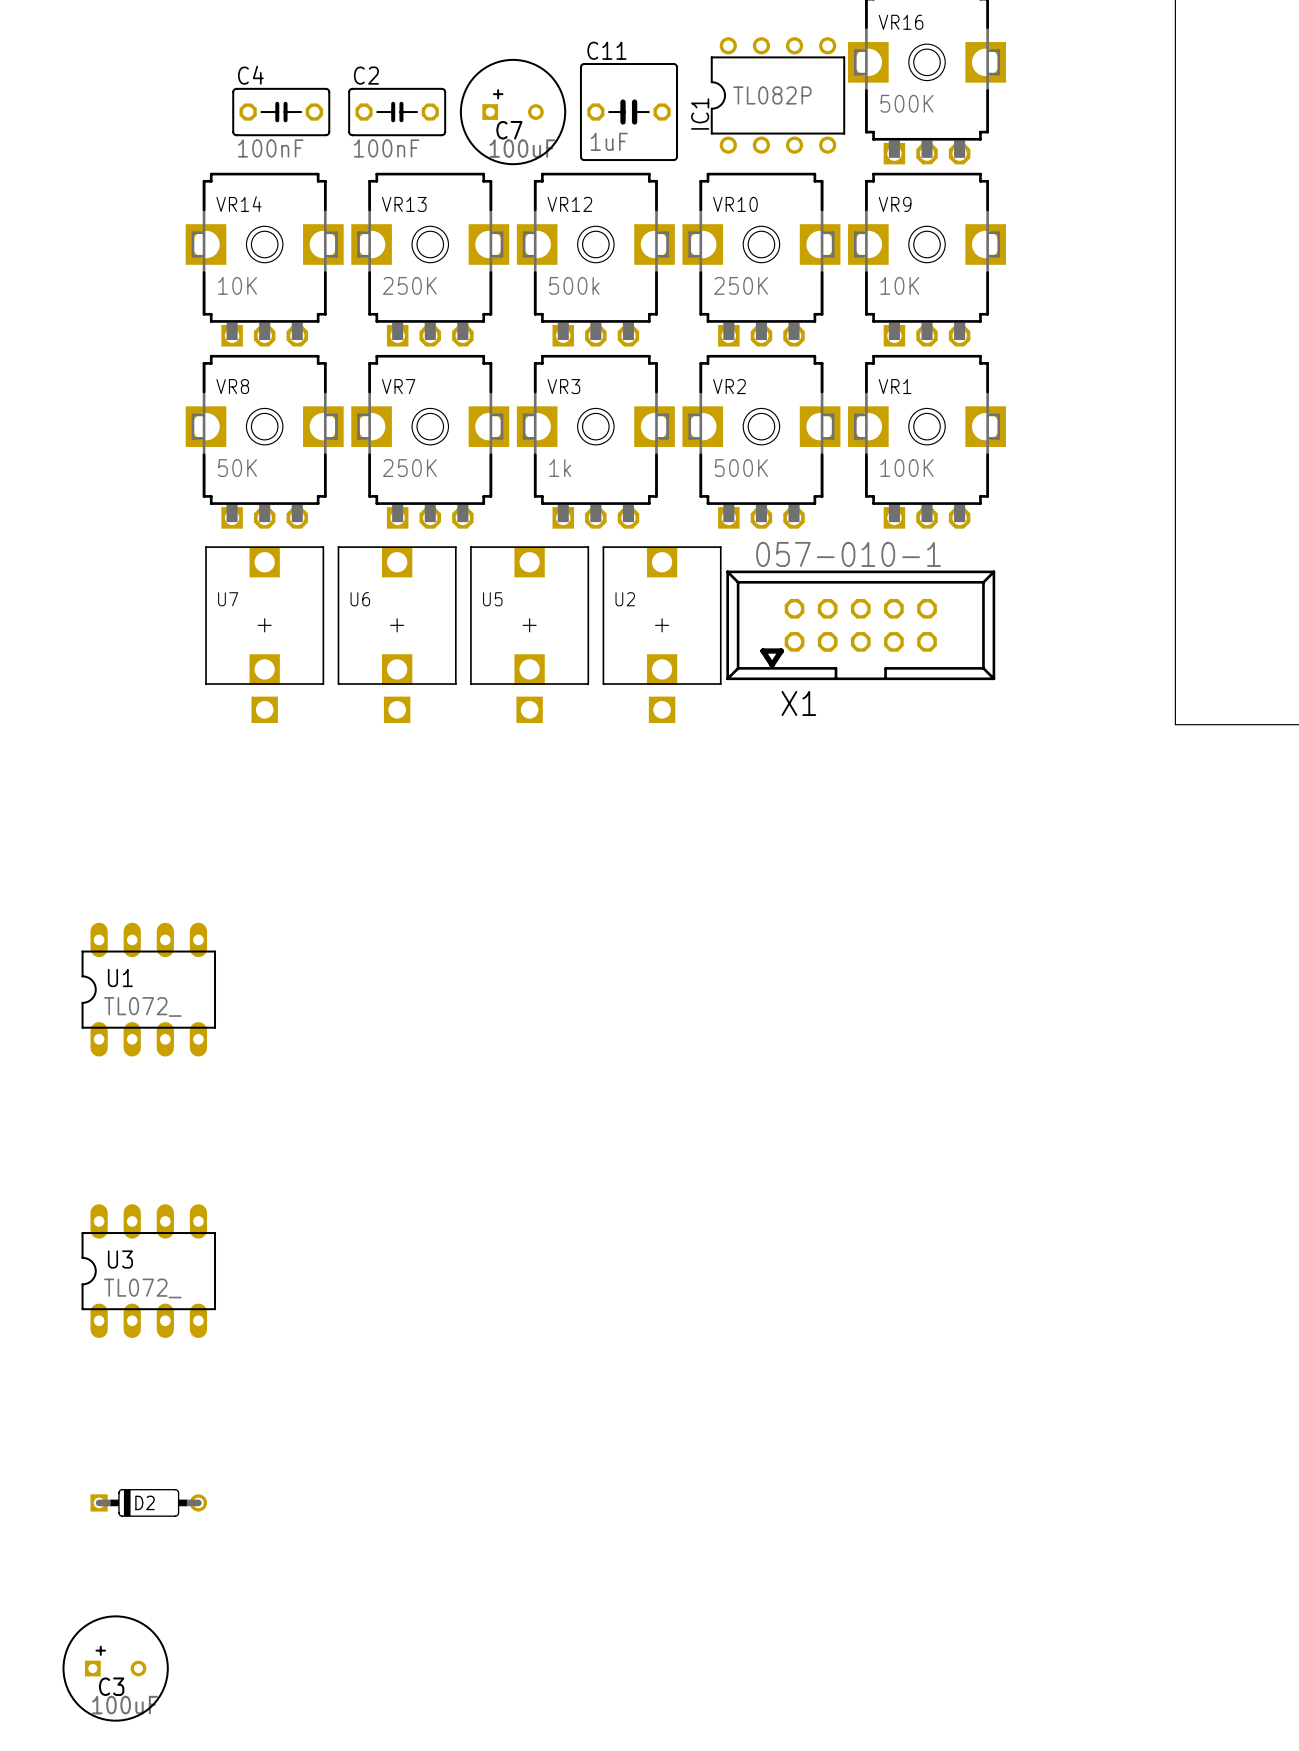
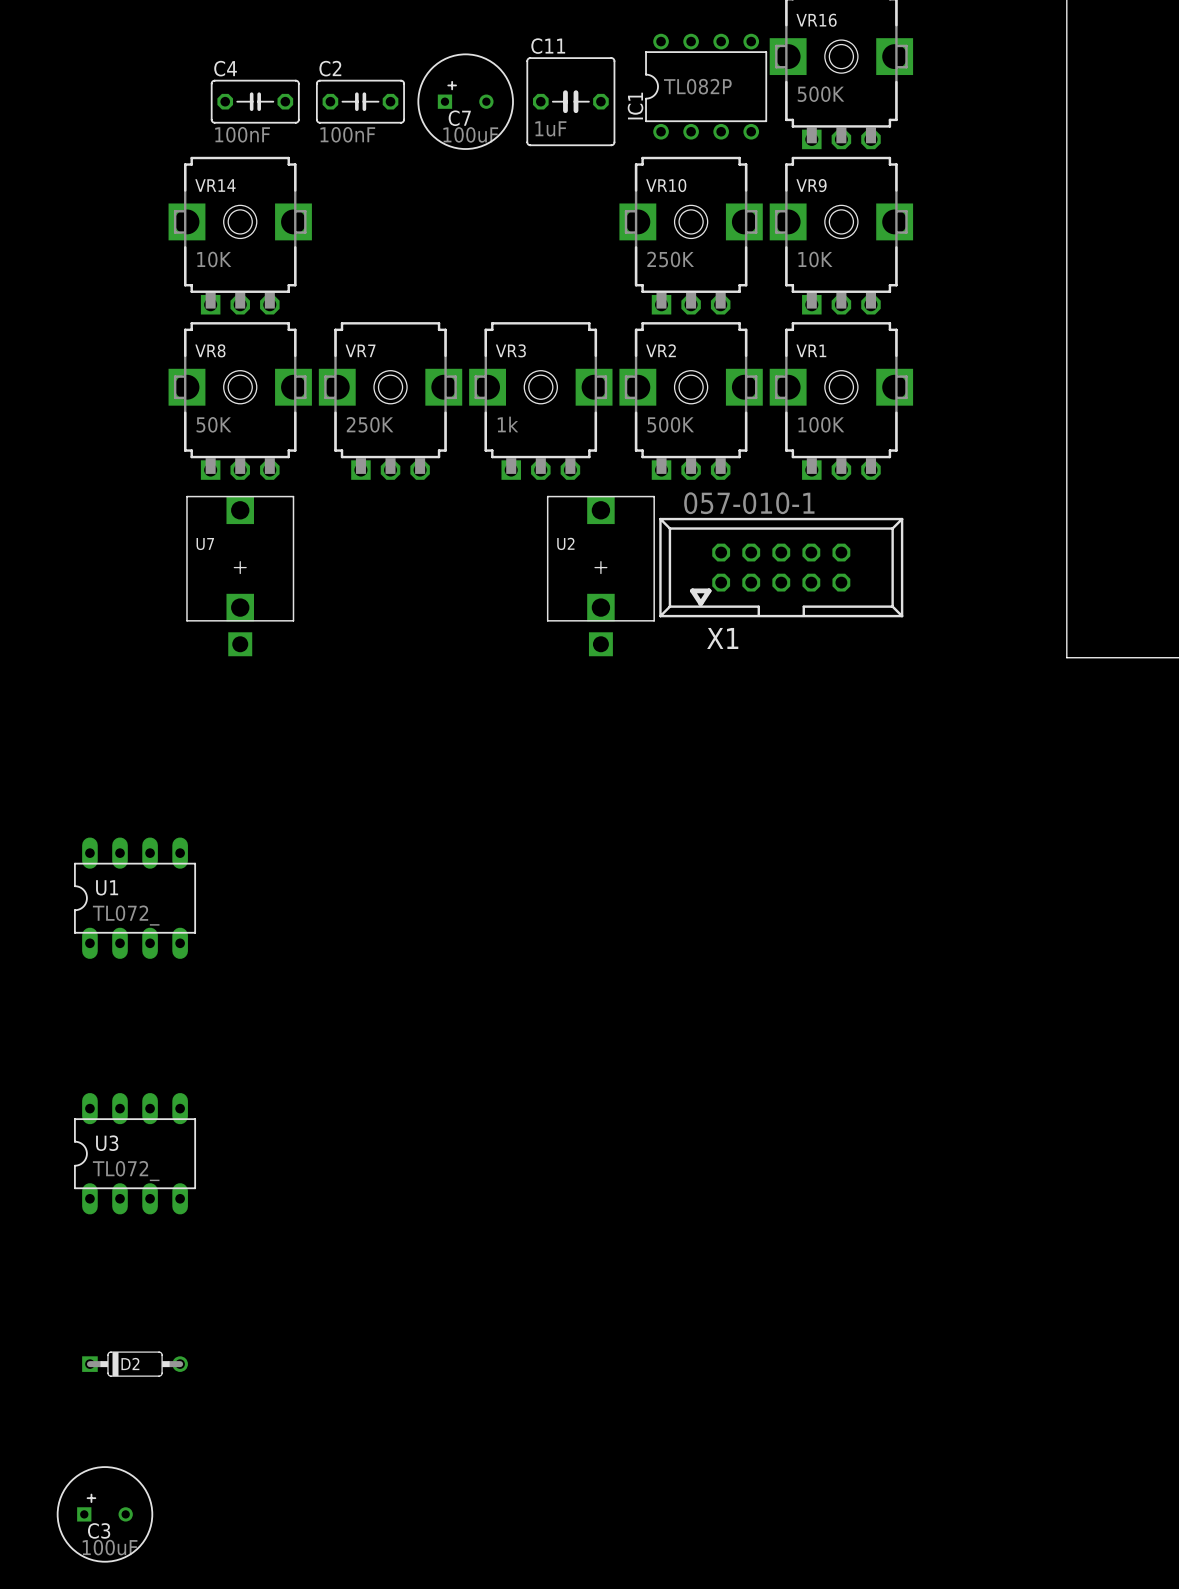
VR13: 250K (430, 259) -> none
VR12: 500k (595, 259) -> none
U6: (397, 634) -> none
U5: (529, 634) -> none

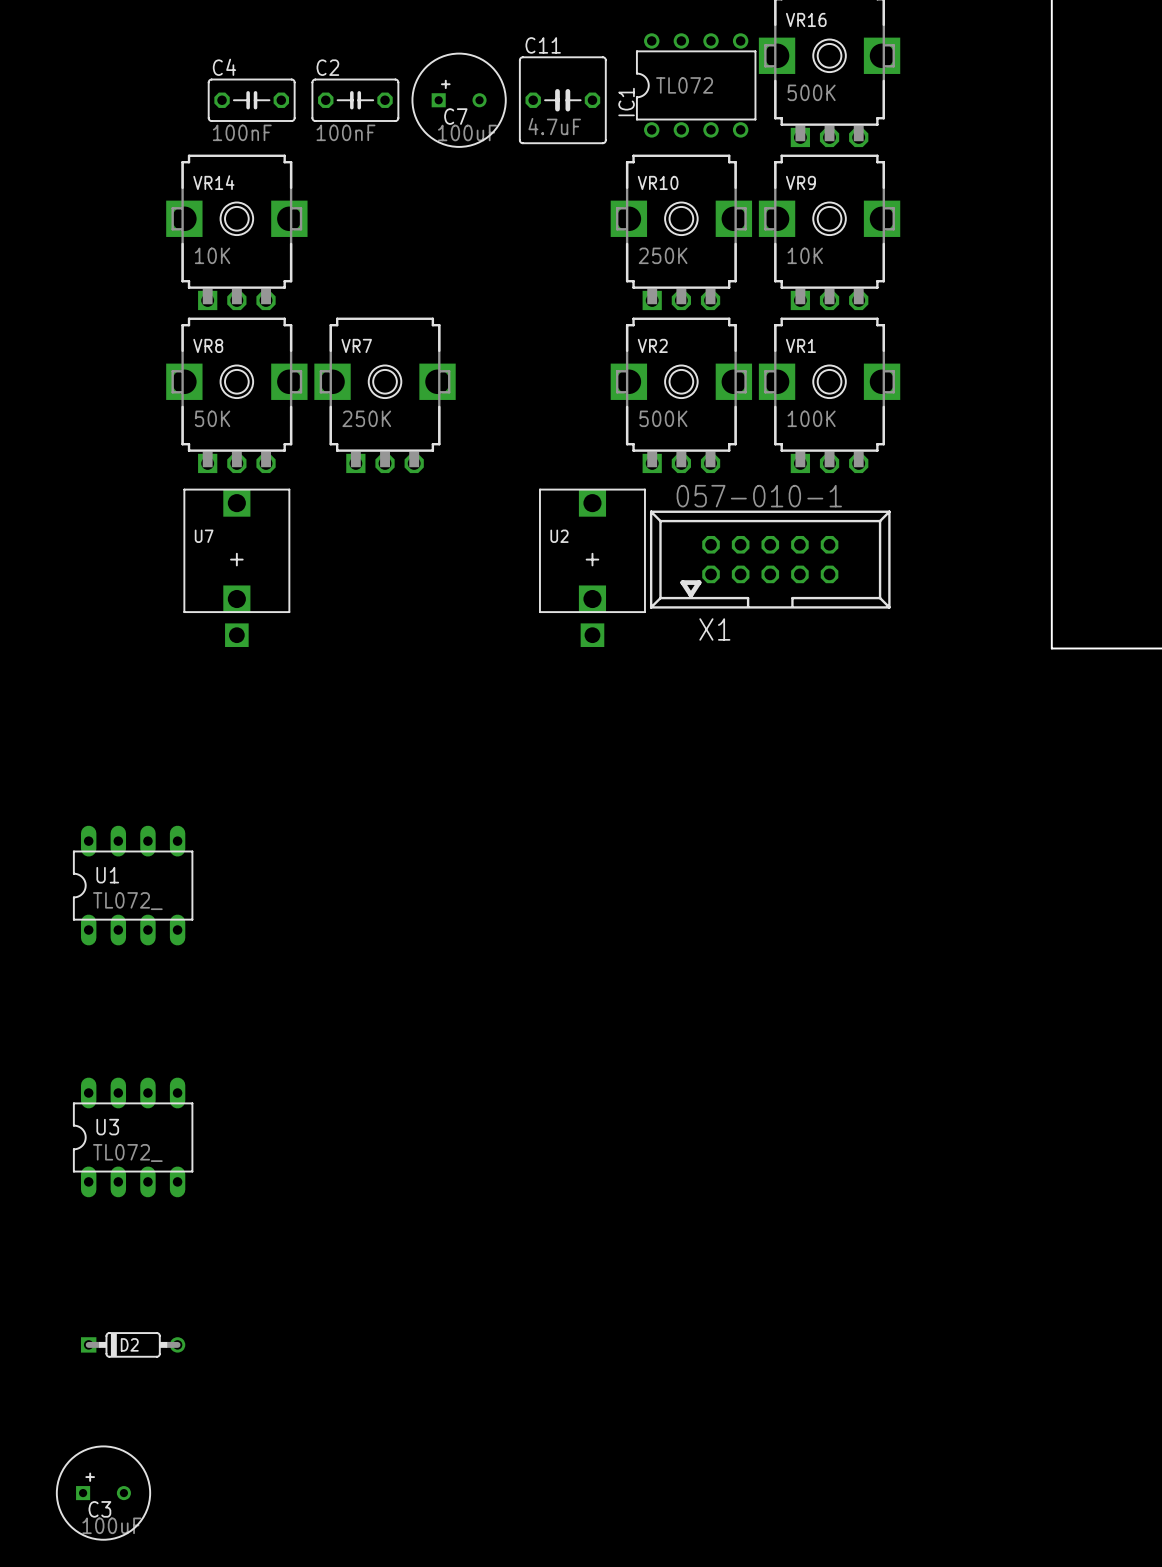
IC1 value: TL082P (697, 86) -> TL072 (684, 85)
C11 value: 1uF (550, 128) -> 4.7uF (554, 126)
VR3: 1k (540, 400) -> none

